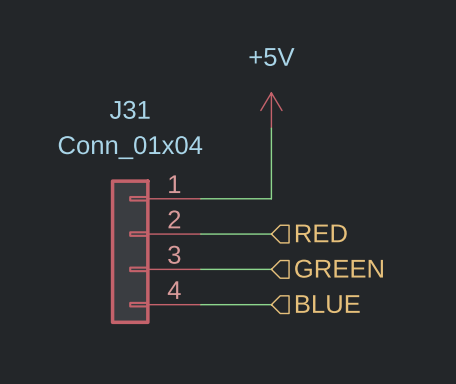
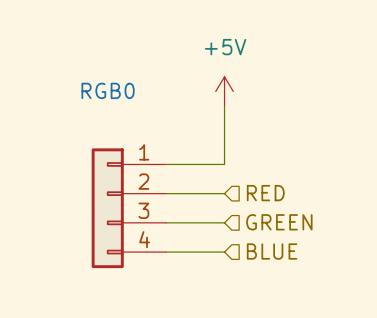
J31 name: J31 (129, 109) -> RGB0 (108, 90)
J31 value: Conn_01x04 (130, 147) -> none

